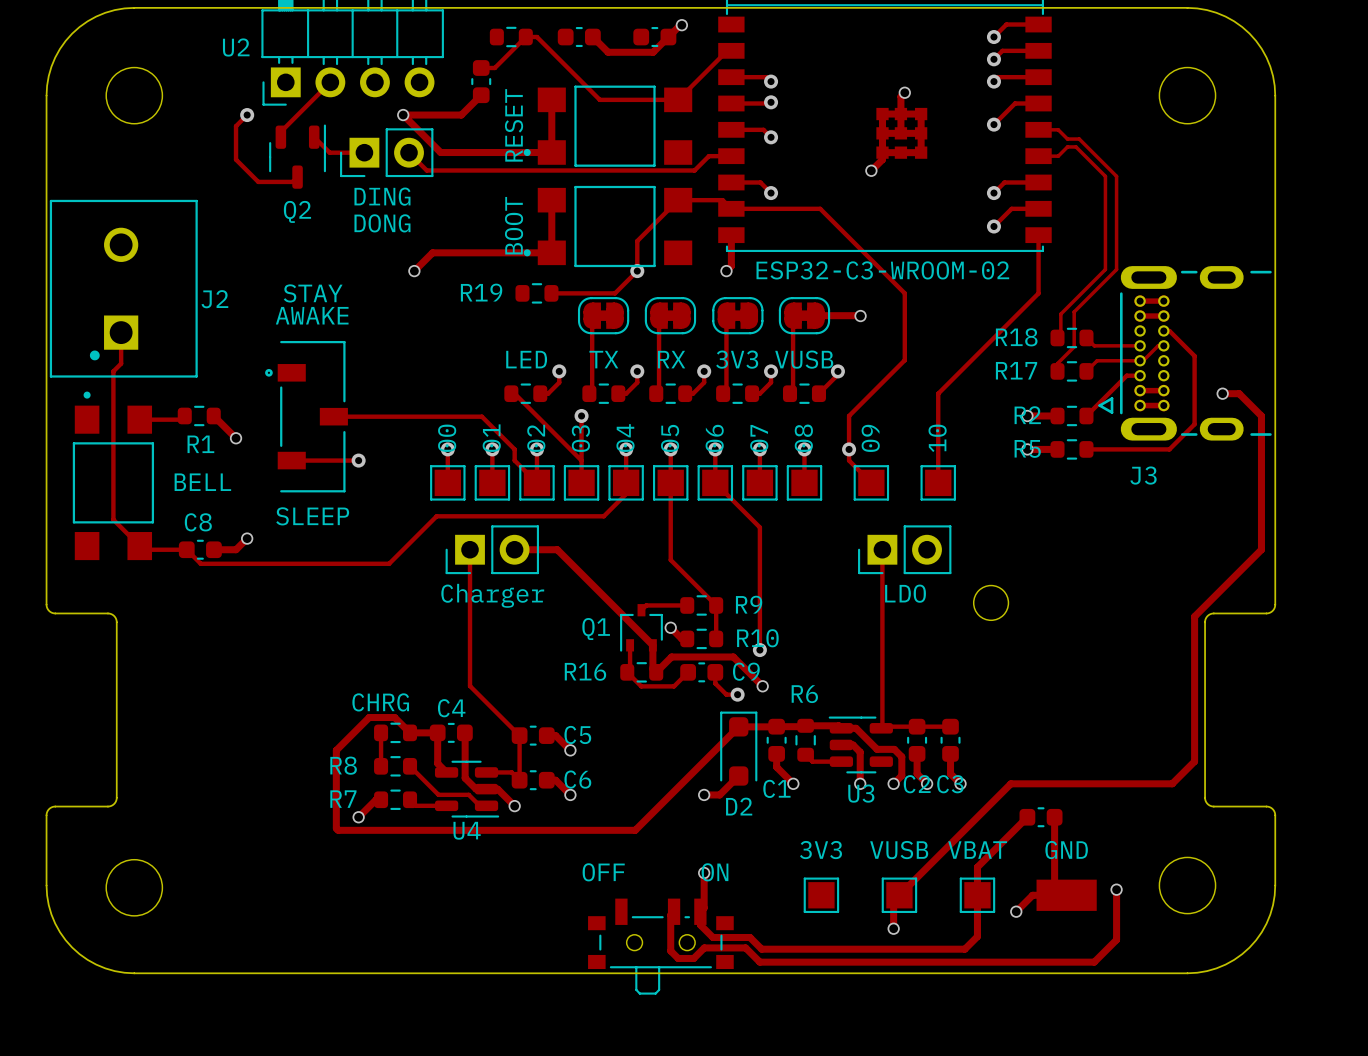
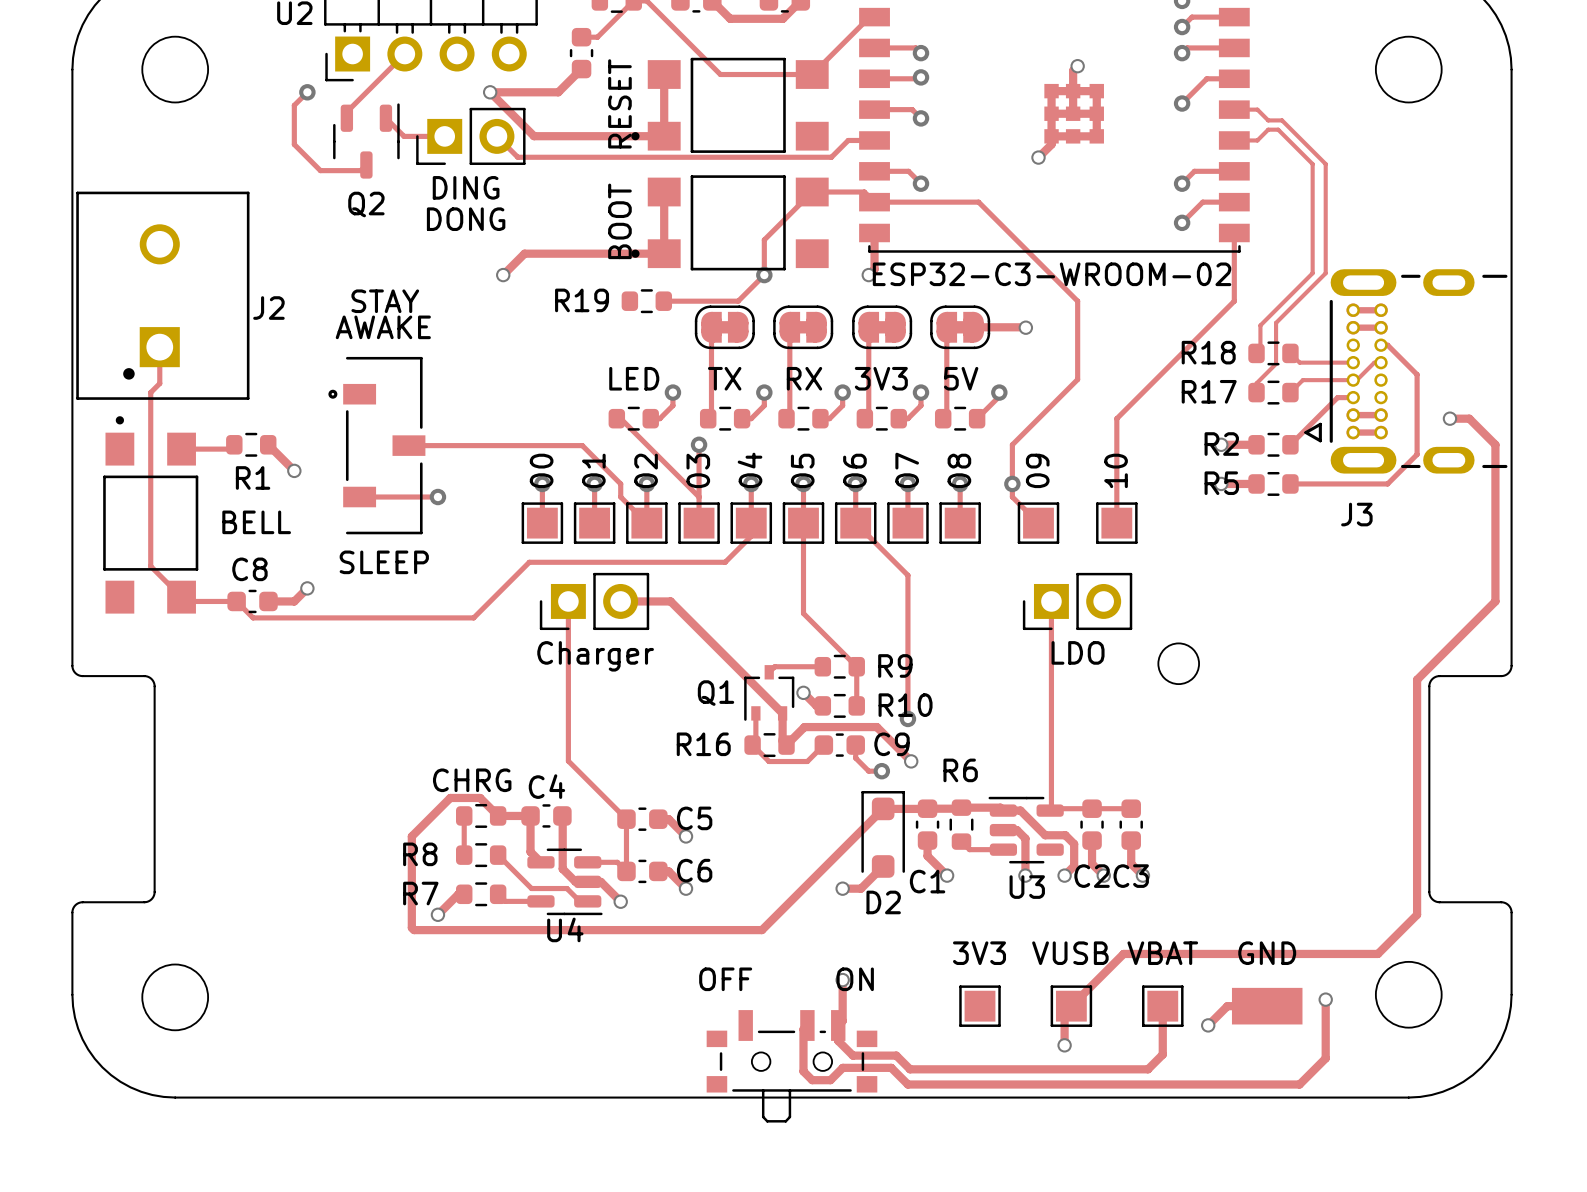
part text: VUSB (804, 359) -> 5V (961, 378)
track: (1194, 761) (1172, 783) (1010, 783) (944, 850) -> (1417, 849) (1417, 914) (1377, 953) (1123, 953)
track: (1027, 817) (977, 867) (977, 895) -> none
part: (1041, 817) -> none
track: (1054, 817) (1054, 883) (1066, 895) -> none

